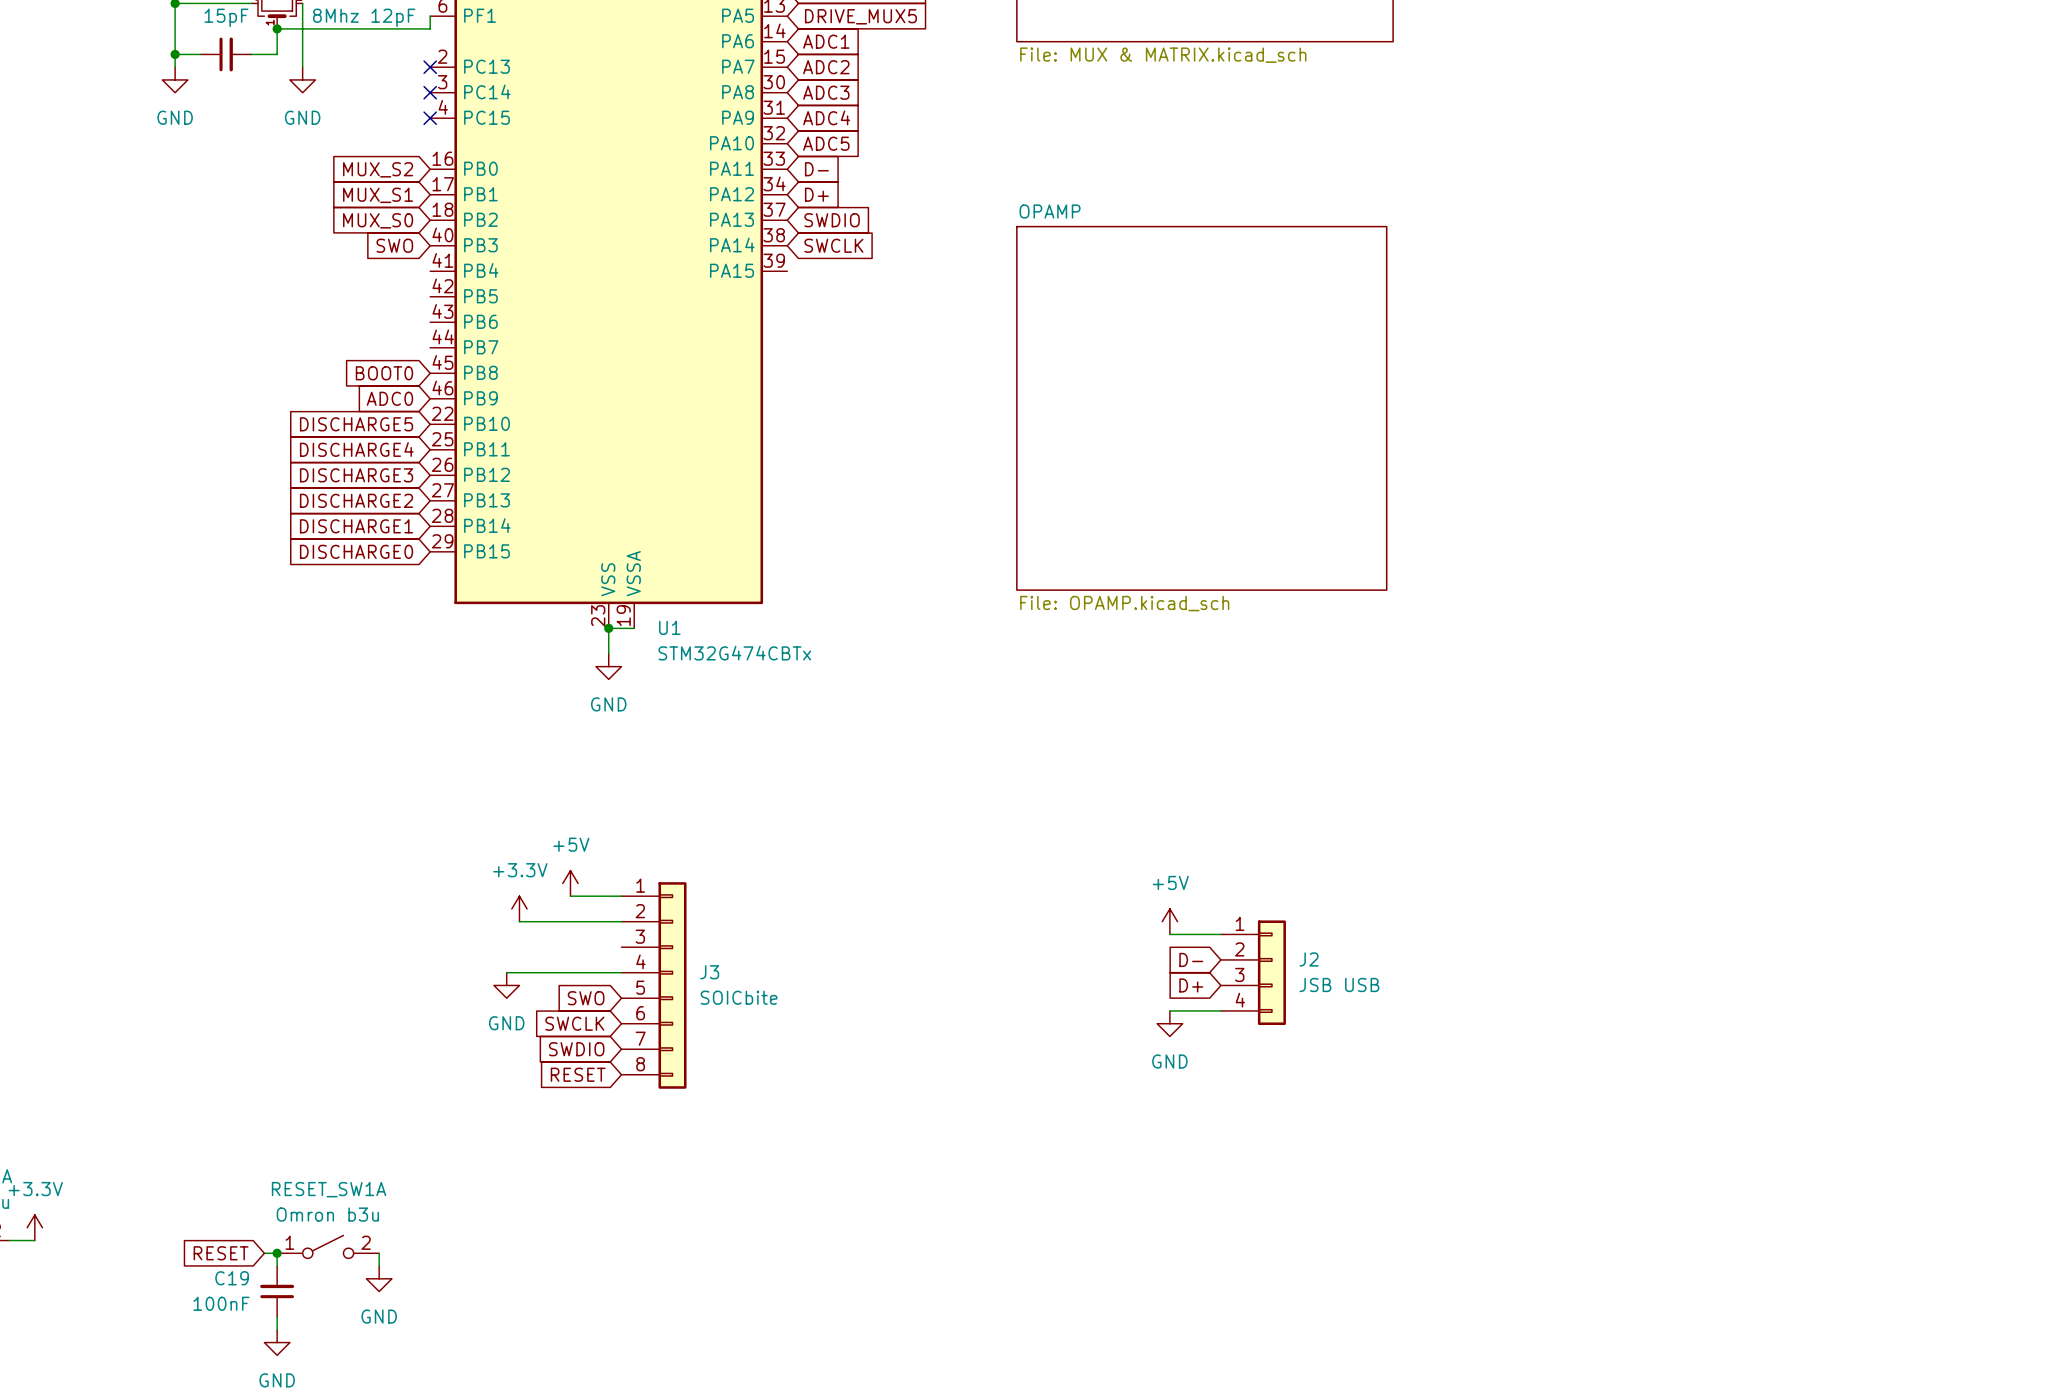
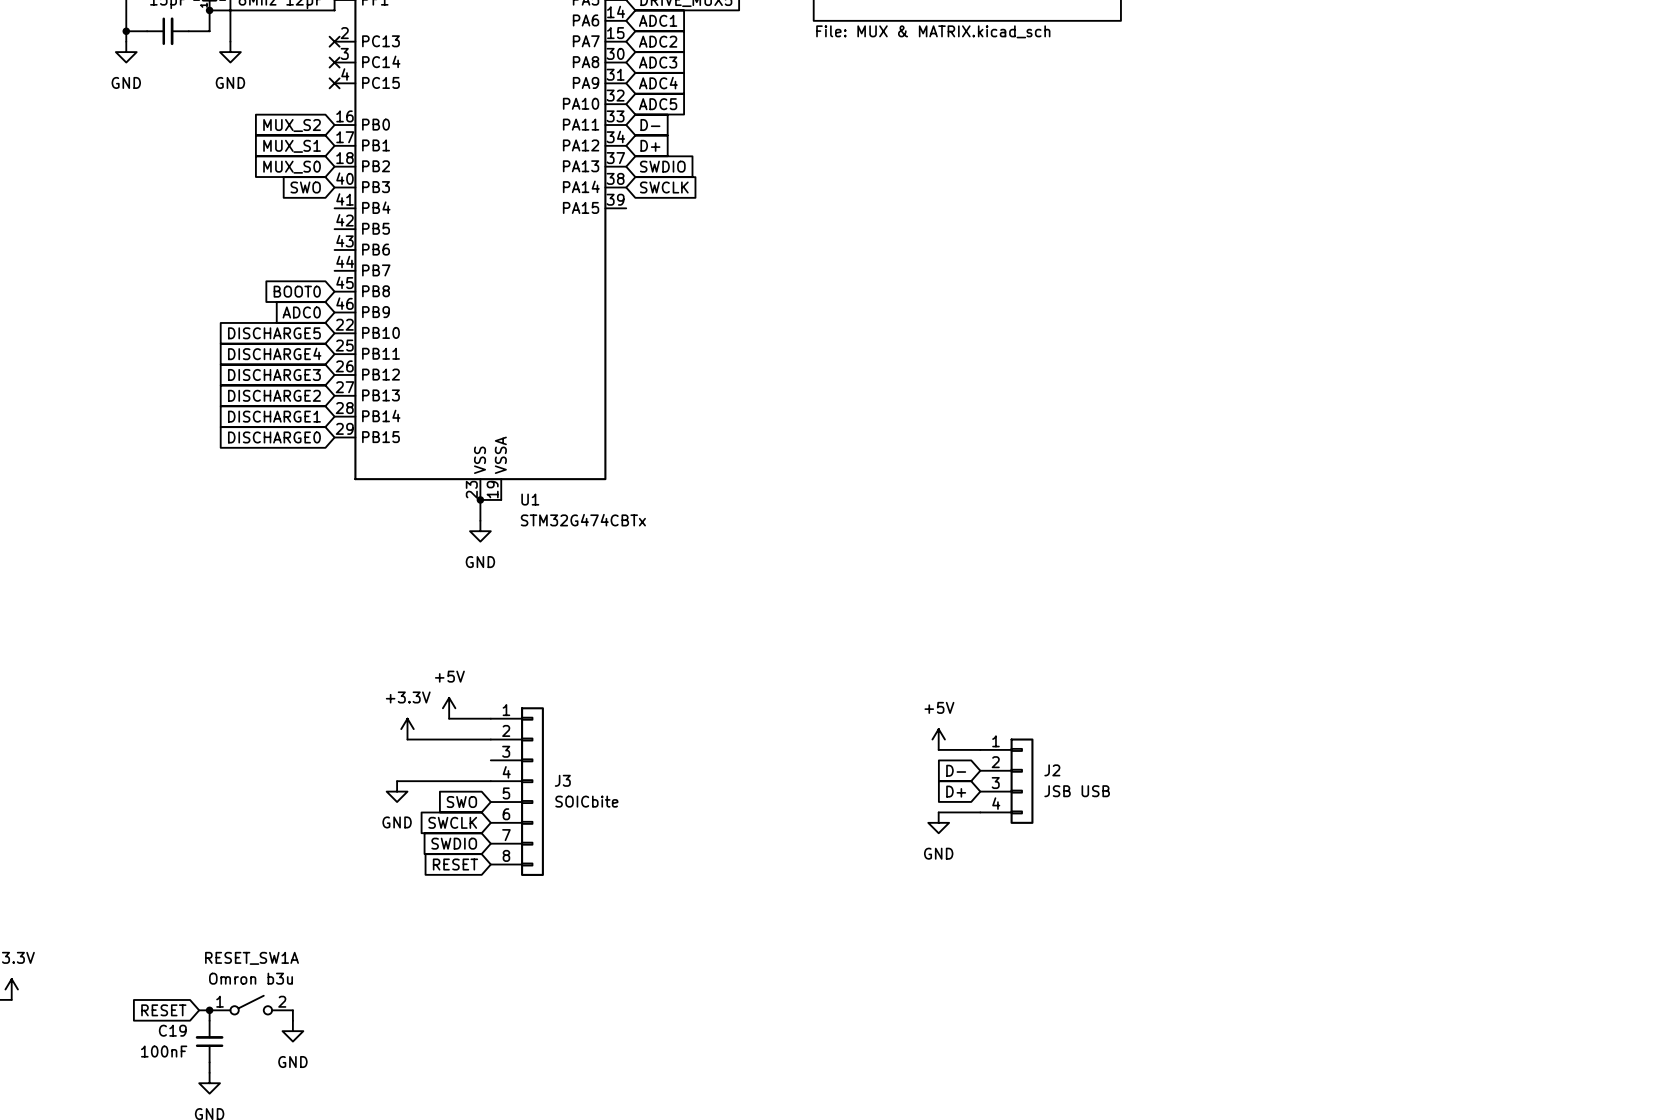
sheet OPAMP: File: OPAMP.kicad_sch (1201, 408) -> none

